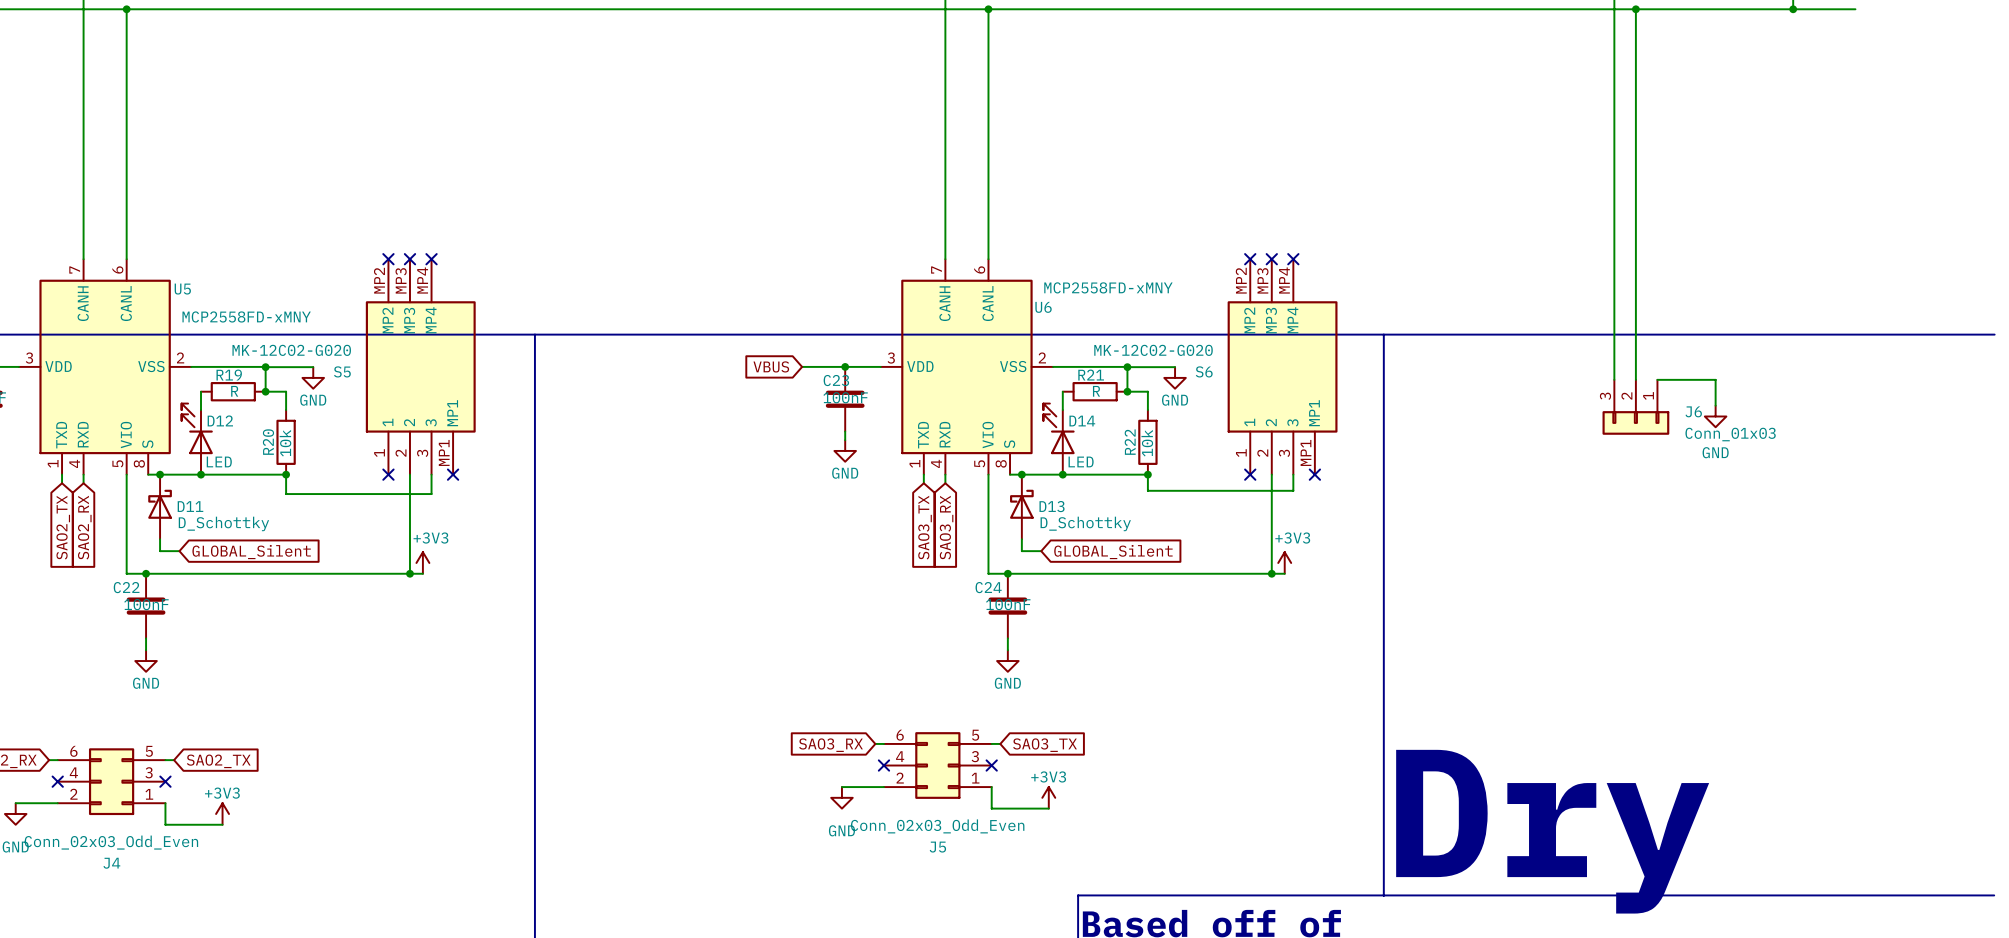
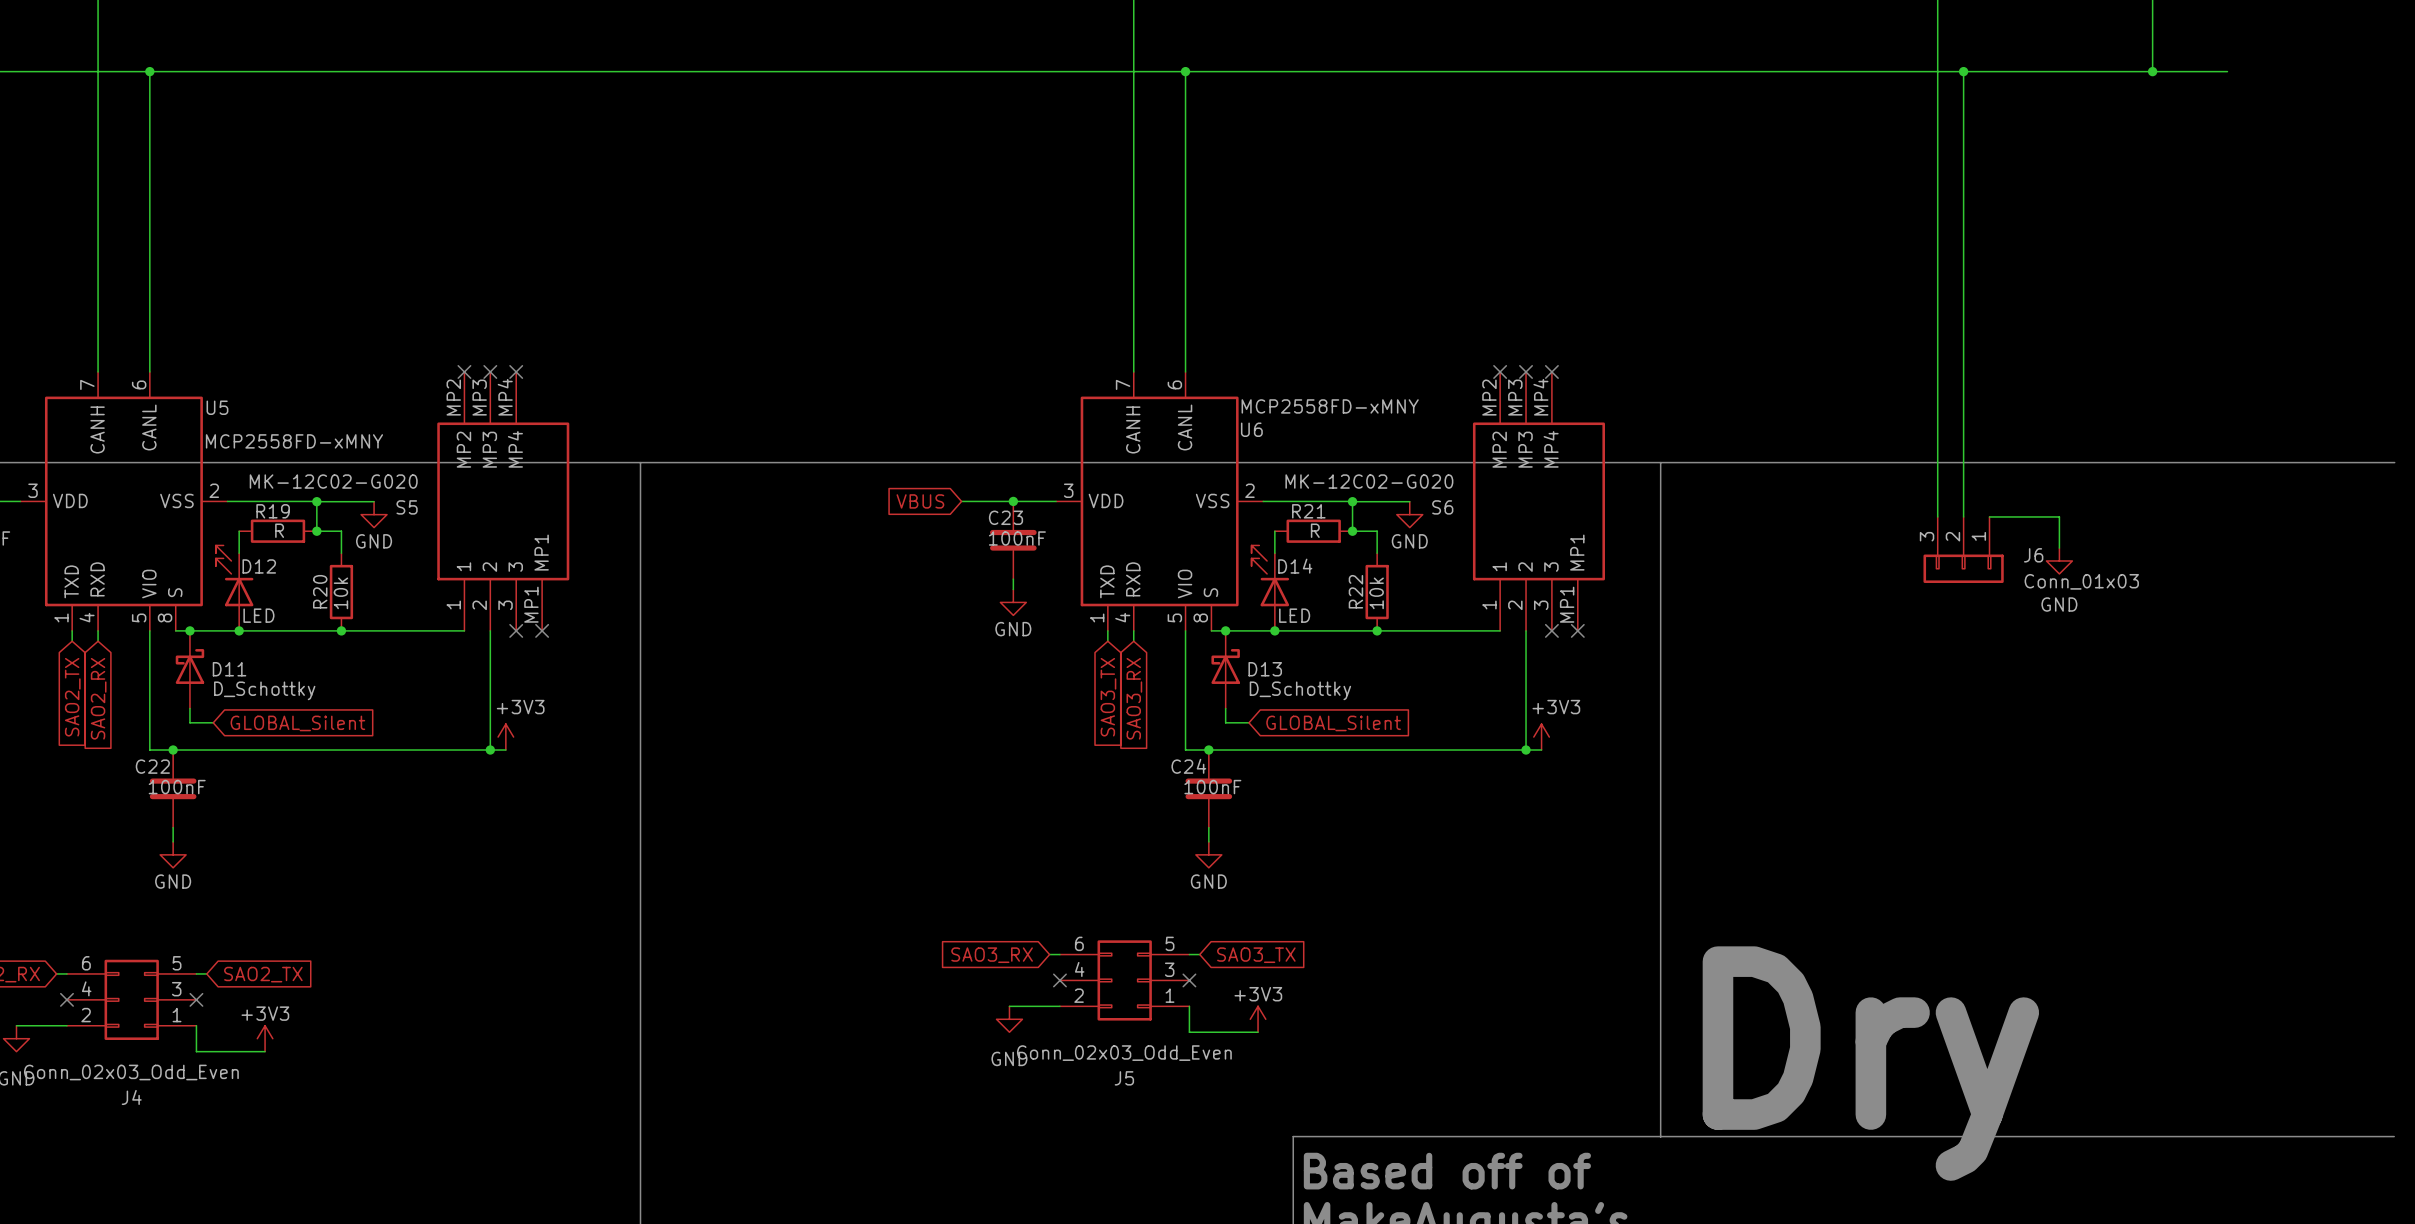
wire: (286, 474) (286, 494) (431, 494) (431, 474) -> (341, 630) (464, 630)
no-connect mark position: (388, 474) -> (516, 630)
wire: (1147, 474) (1147, 490) (1293, 490) (1293, 474) -> (1377, 630) (1500, 630)
no-connect mark position: (1250, 474) -> (1551, 630)

